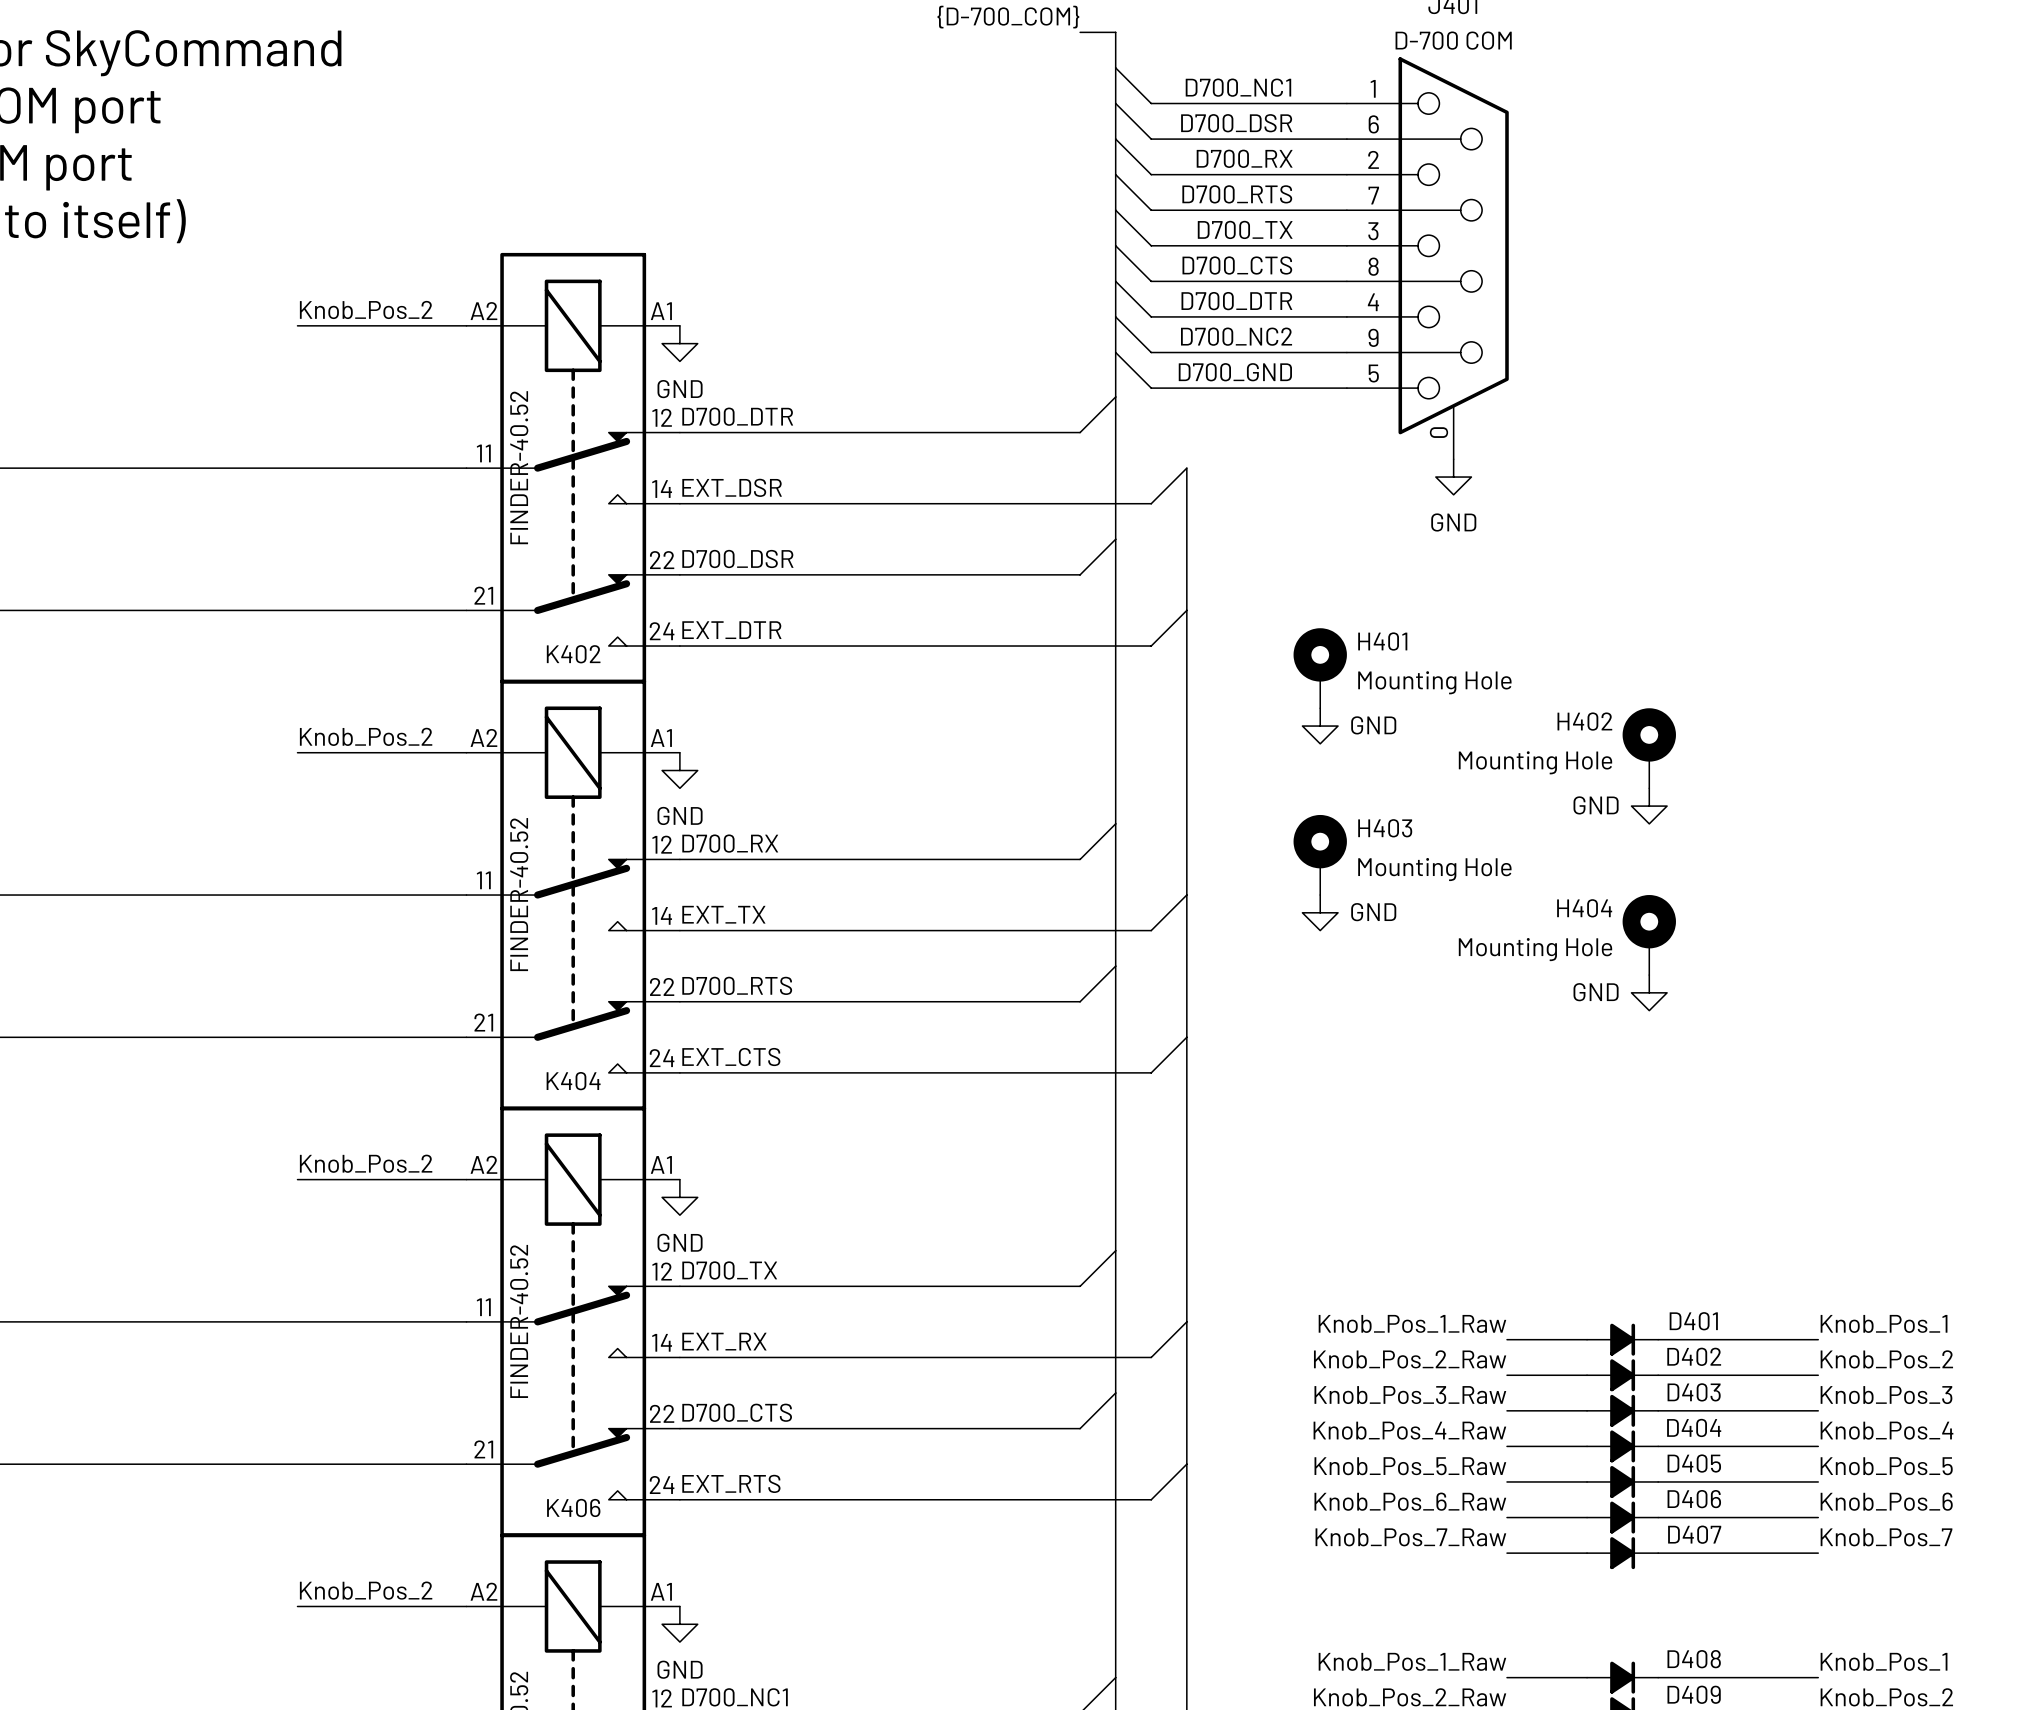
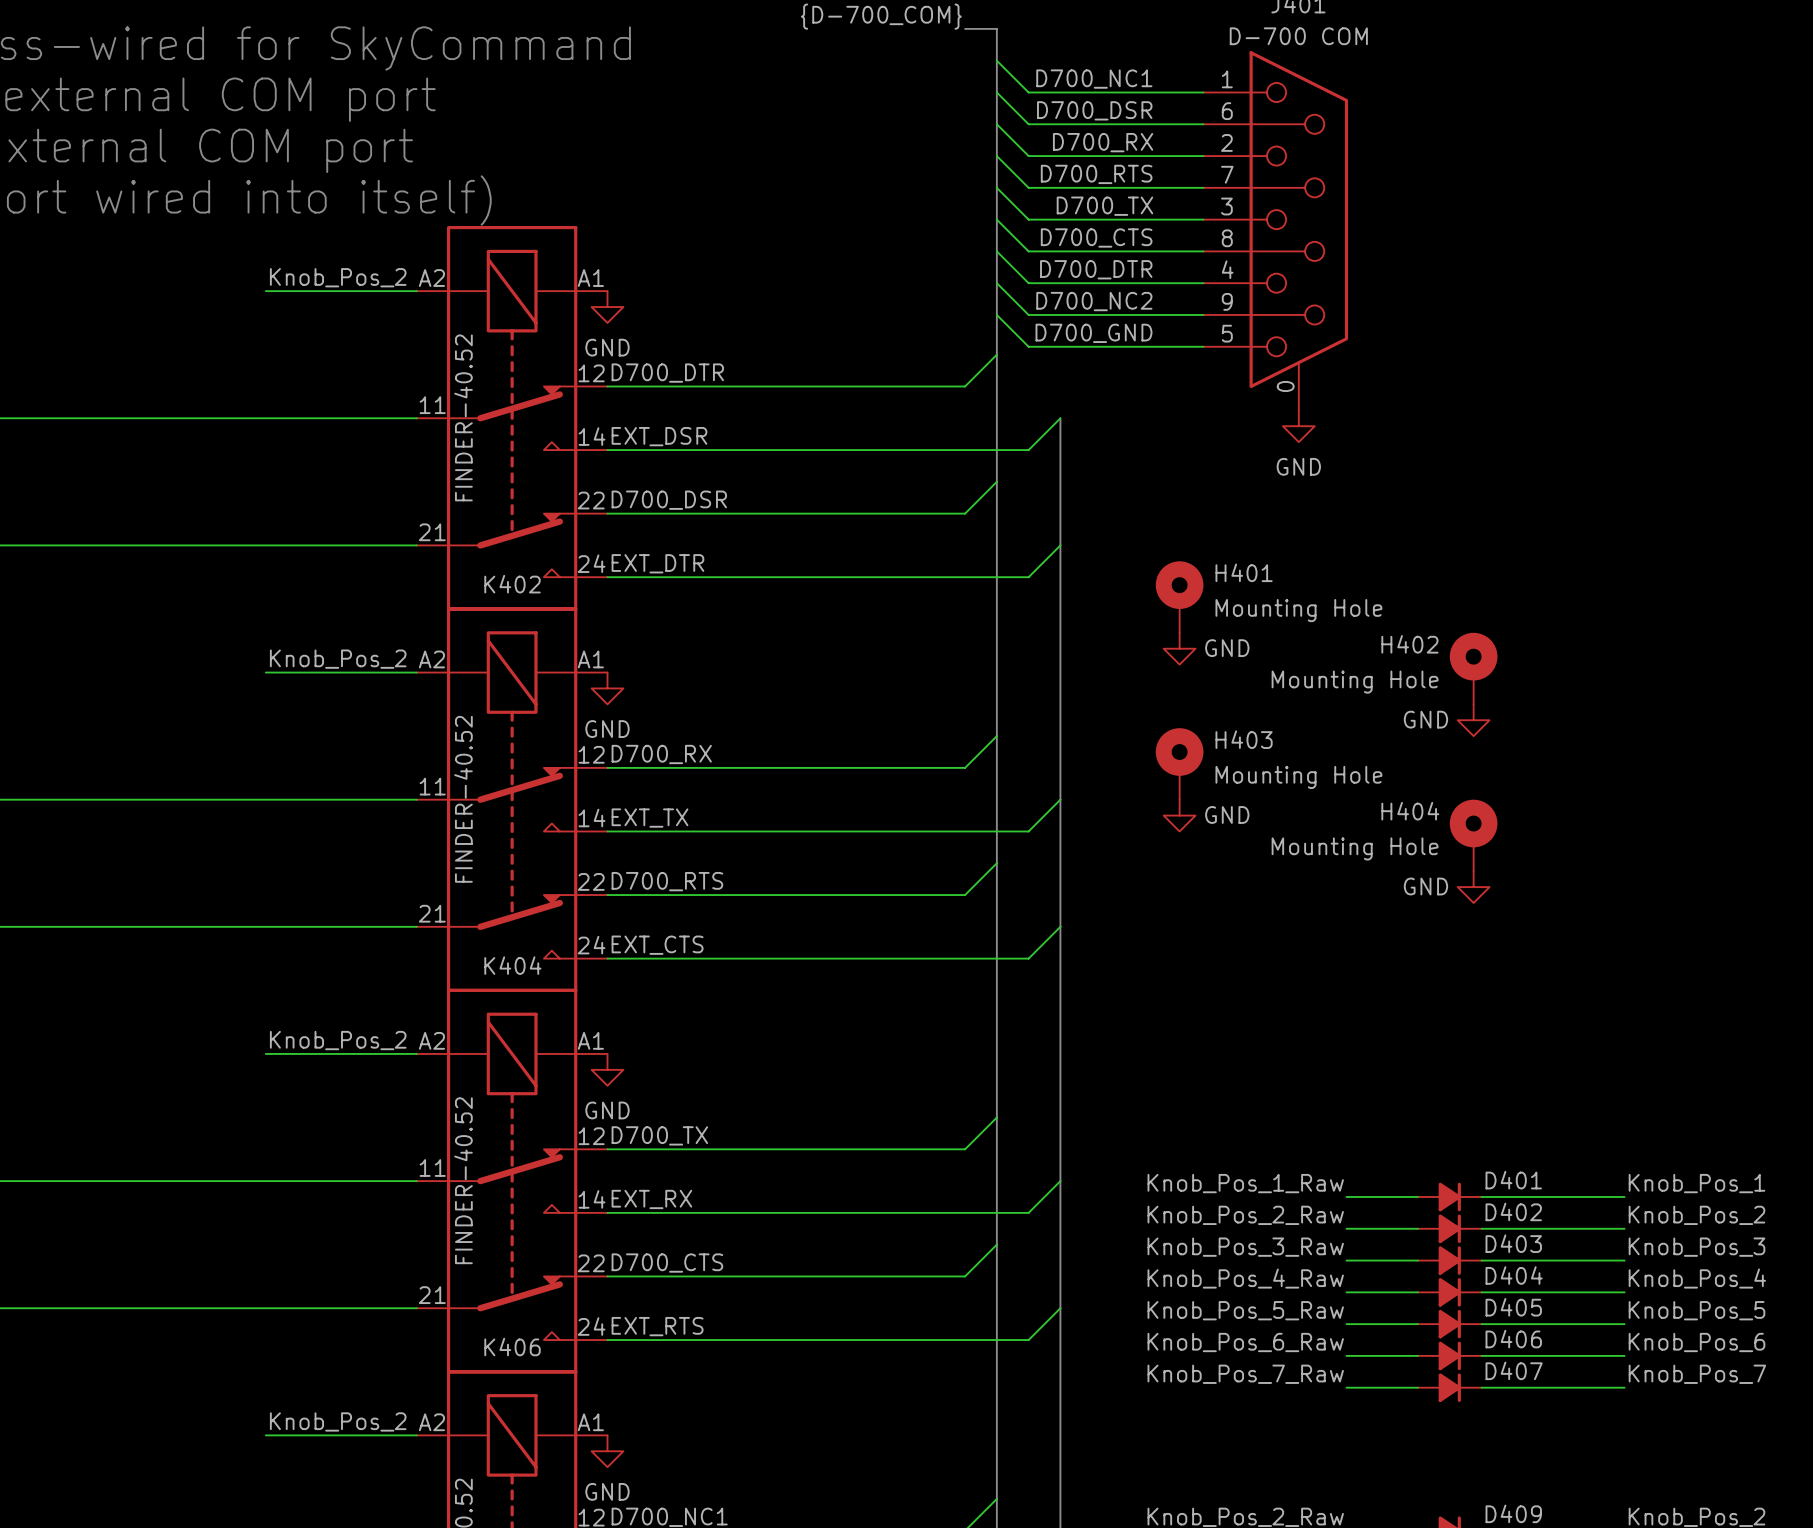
label: Knob_Pos_1_Raw (1412, 1661) -> none
label: Knob_Pos_1 (1884, 1661) -> none
wire: (1506, 1677) (1587, 1677) -> none
D408: (1622, 1677) -> none
wire: (1658, 1677) (1818, 1677) -> none

